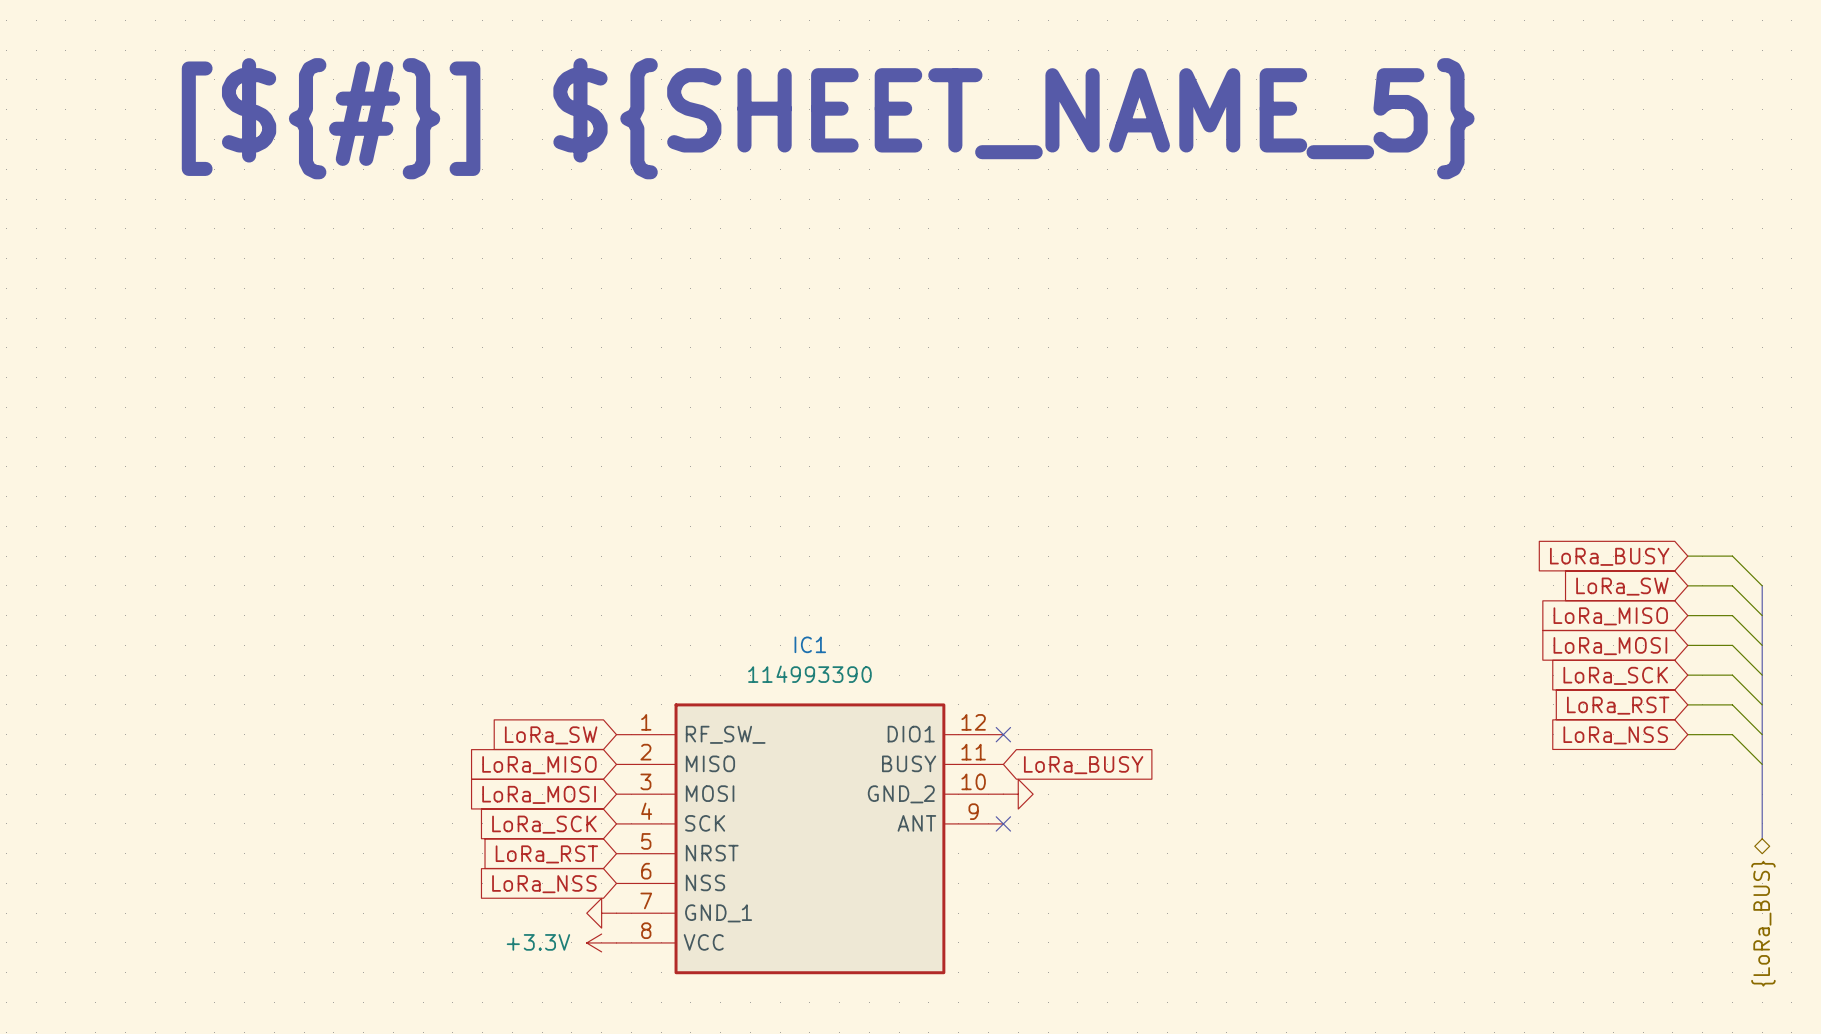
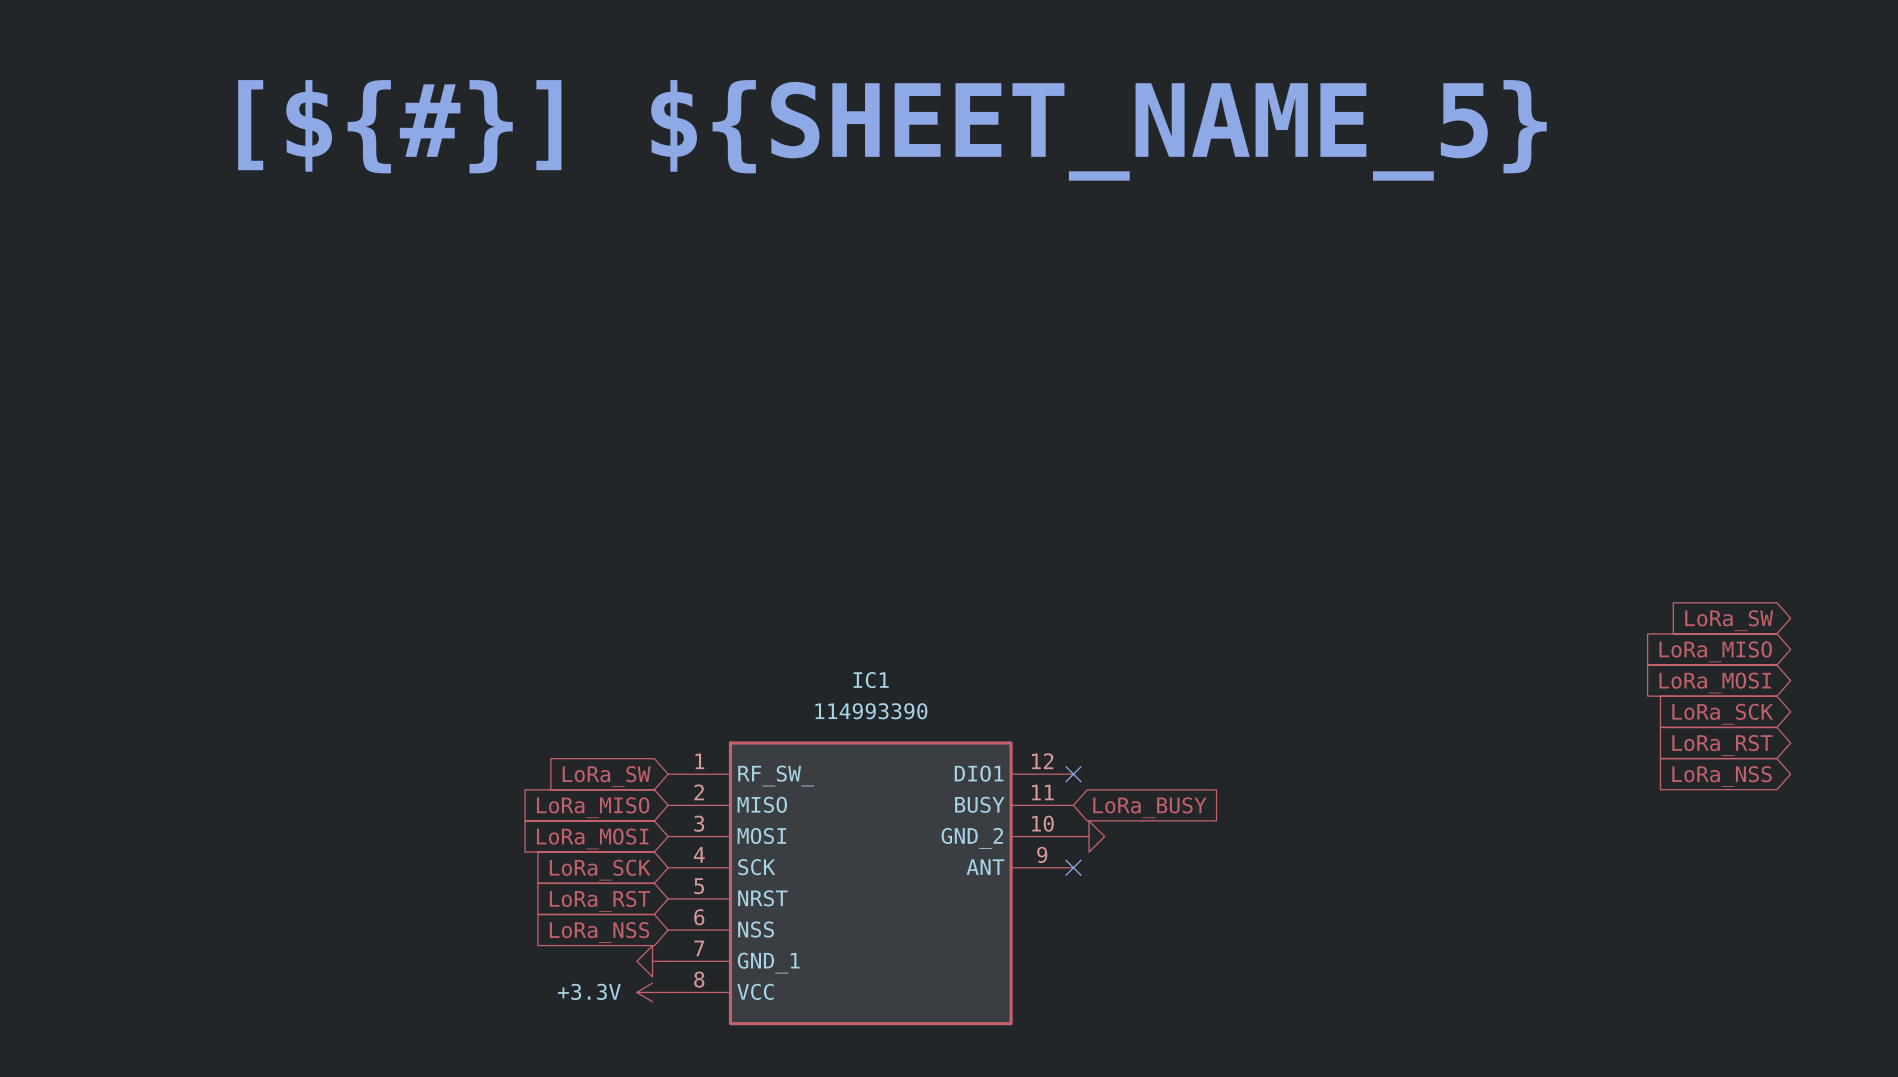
global label: LoRa_BUSY (1609, 556) -> none
wire: (1687, 556) (1732, 556) (1762, 585) -> none
wire: (1687, 585) (1732, 585) (1762, 615) -> none
bus: (1762, 585) (1762, 838) -> none
wire: (1687, 615) (1732, 615) (1762, 645) -> none
wire: (1687, 645) (1732, 645) (1762, 675) -> none
wire: (1687, 675) (1732, 675) (1762, 704) -> none
wire: (1687, 704) (1732, 704) (1762, 734) -> none
wire: (1687, 734) (1732, 734) (1762, 764) -> none
hierarchical label: {LoRa_BUS} (1763, 923) -> none

